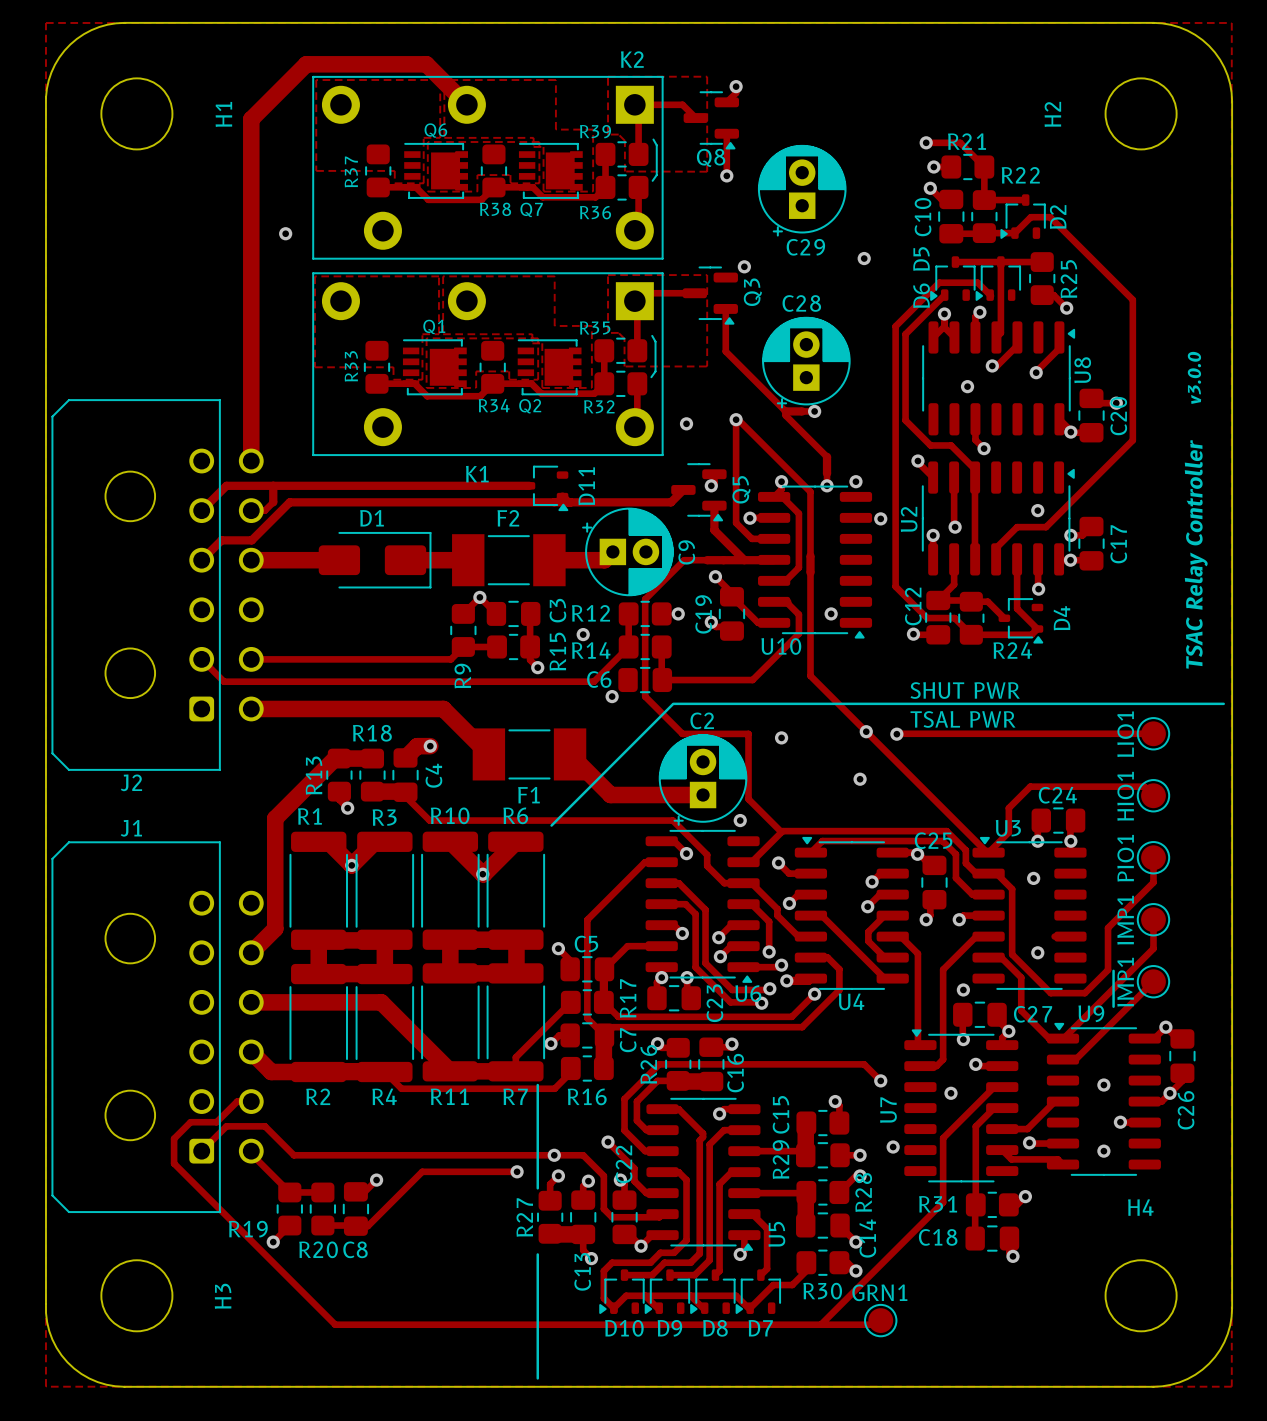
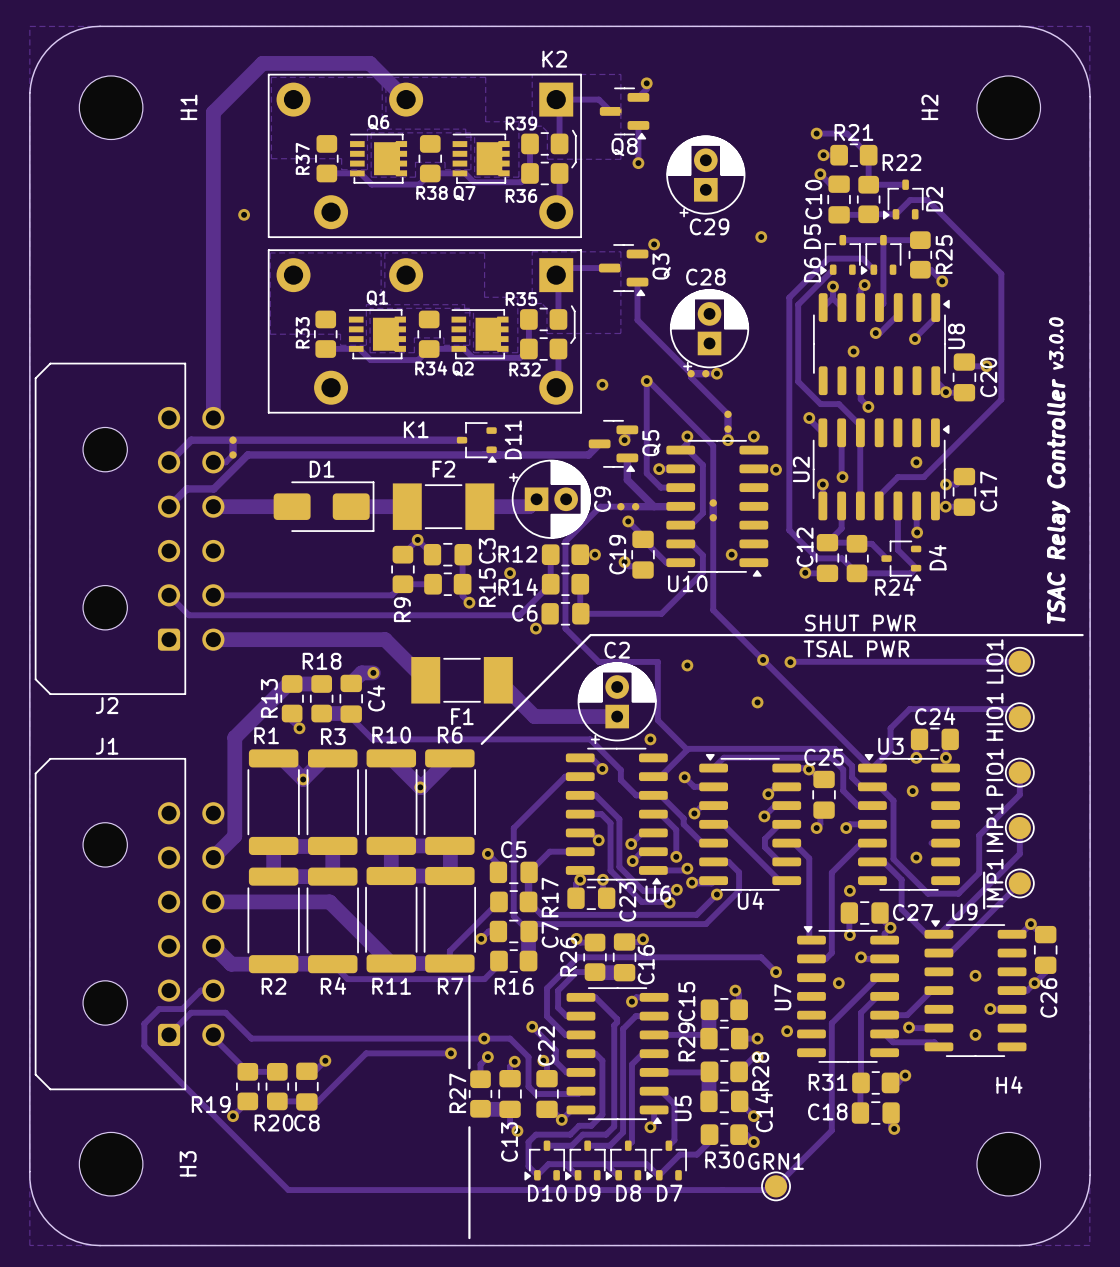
track: (943, 1202) (820, 1324) -> (831, 1080) (831, 1130) (776, 1186)

